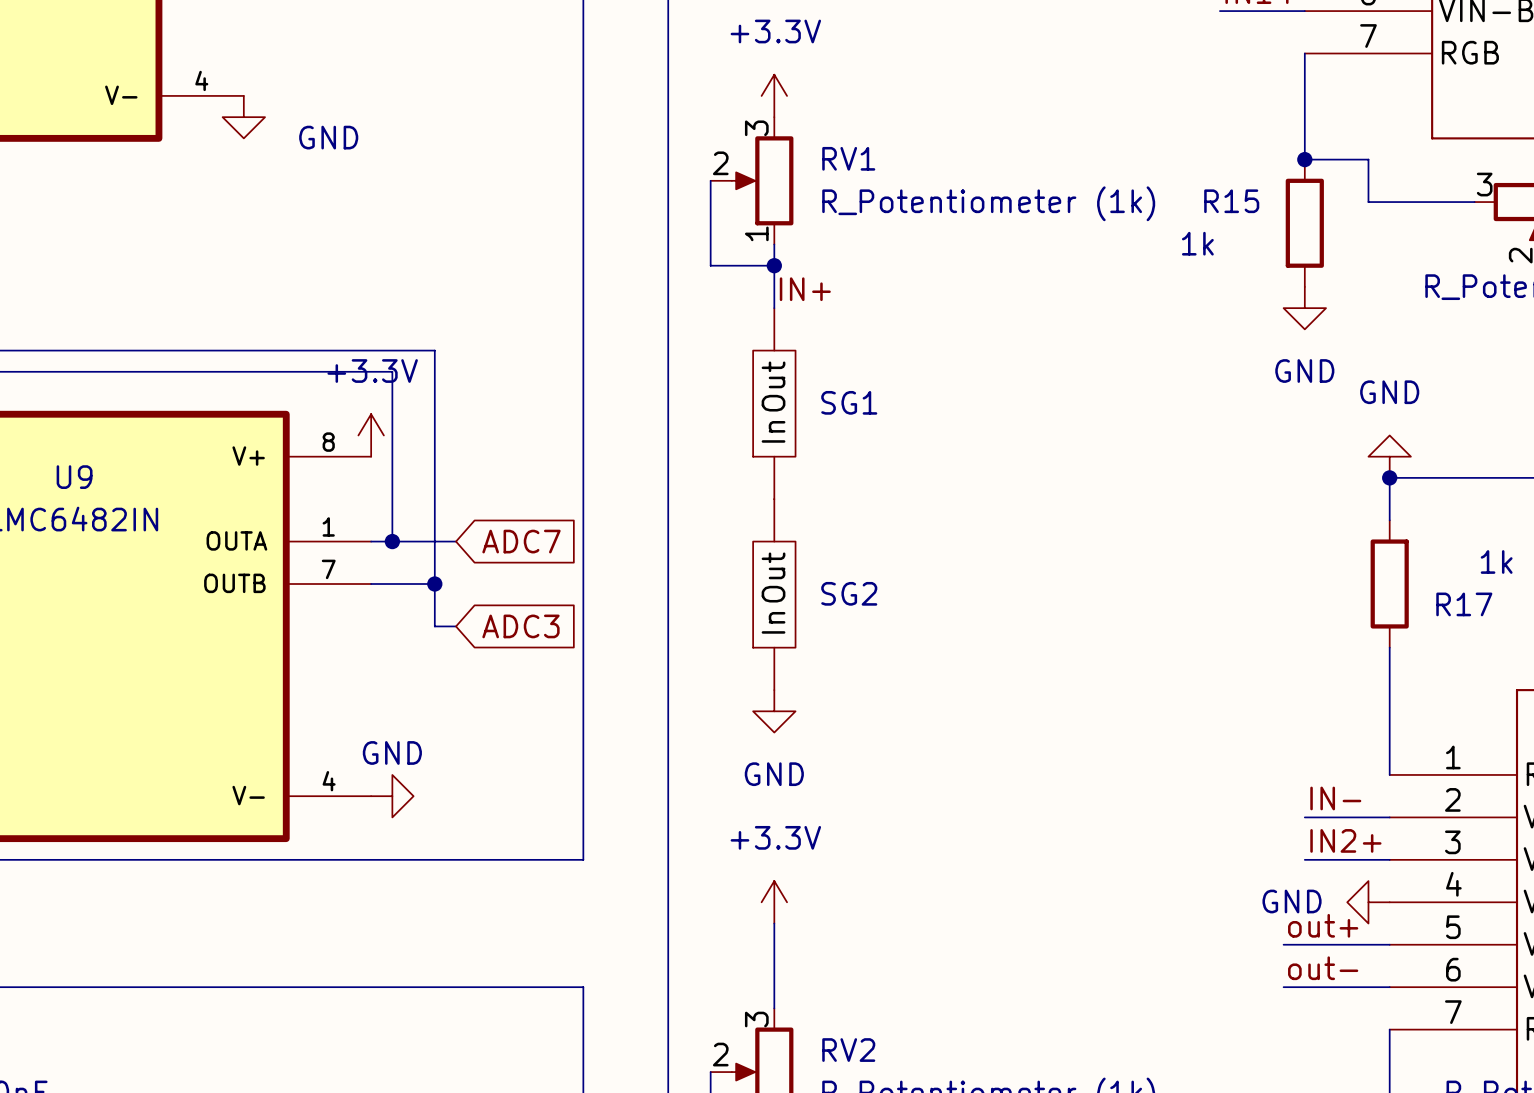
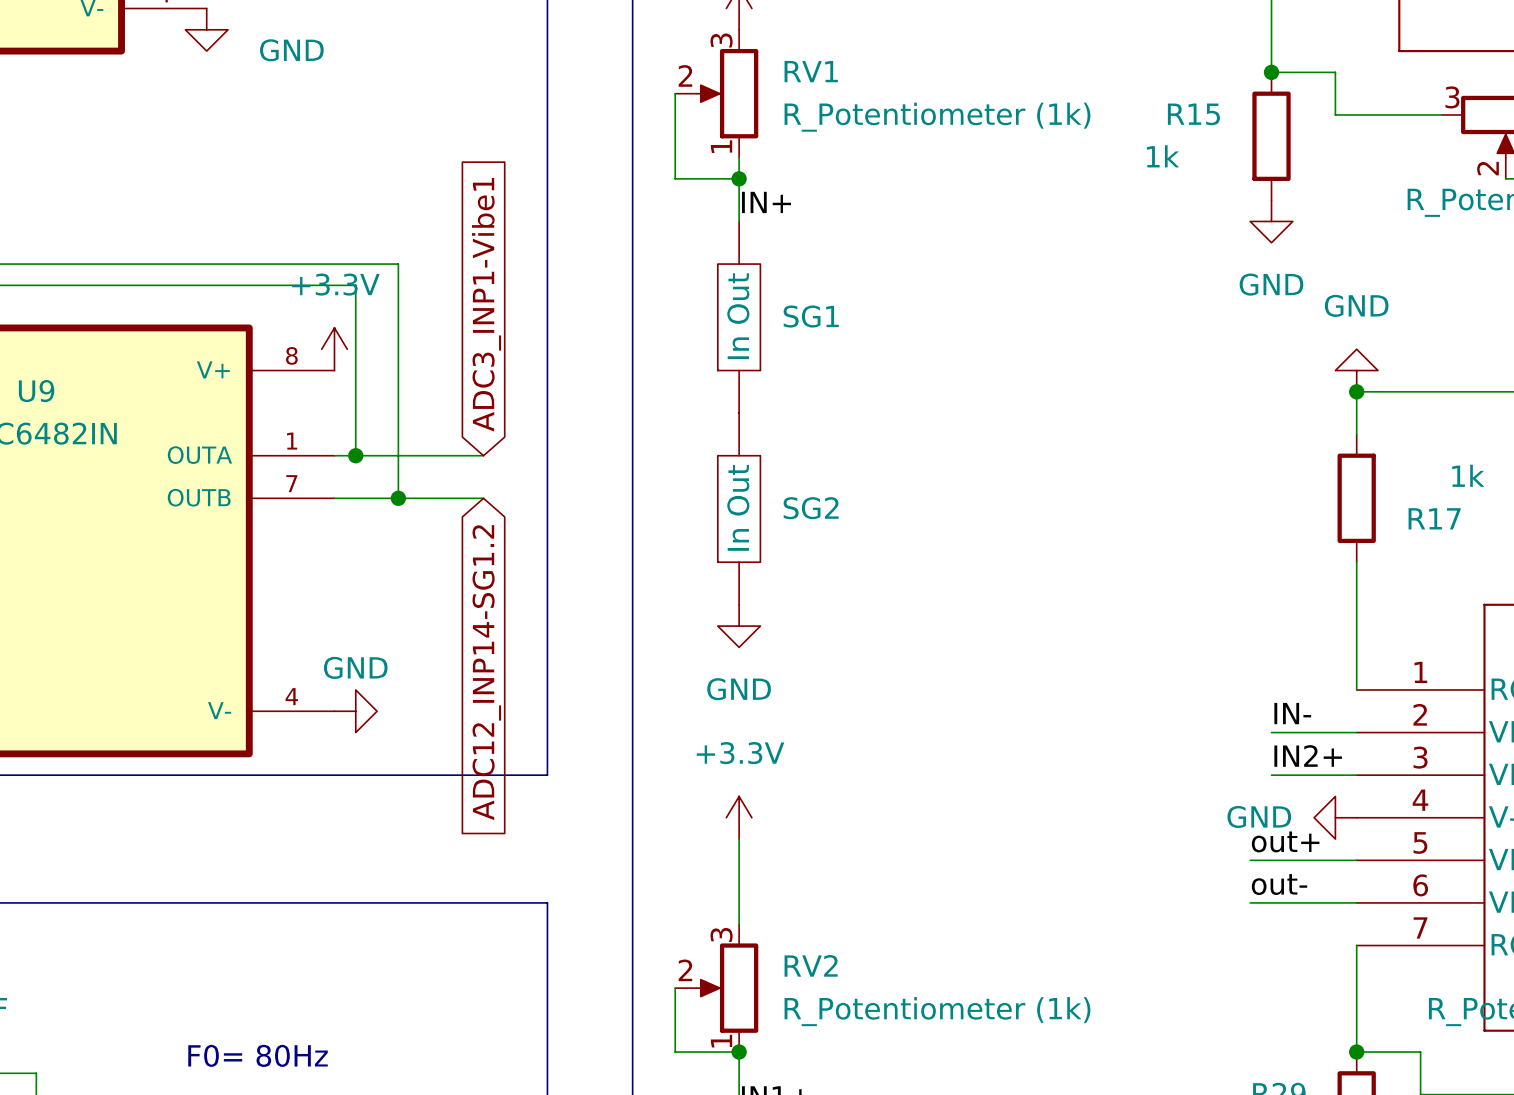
global label: none -> ADC3_INP1-Vibe1 (486, 304)
wire: none -> (419, 455) (483, 455)
global label: ADC7 (521, 541) -> none
wire: (434, 584) (434, 626) (456, 626) -> (398, 498) (483, 498)
global label: ADC3 (520, 626) -> none
global label: none -> ADC12_INP14-SG1.2 (486, 672)

